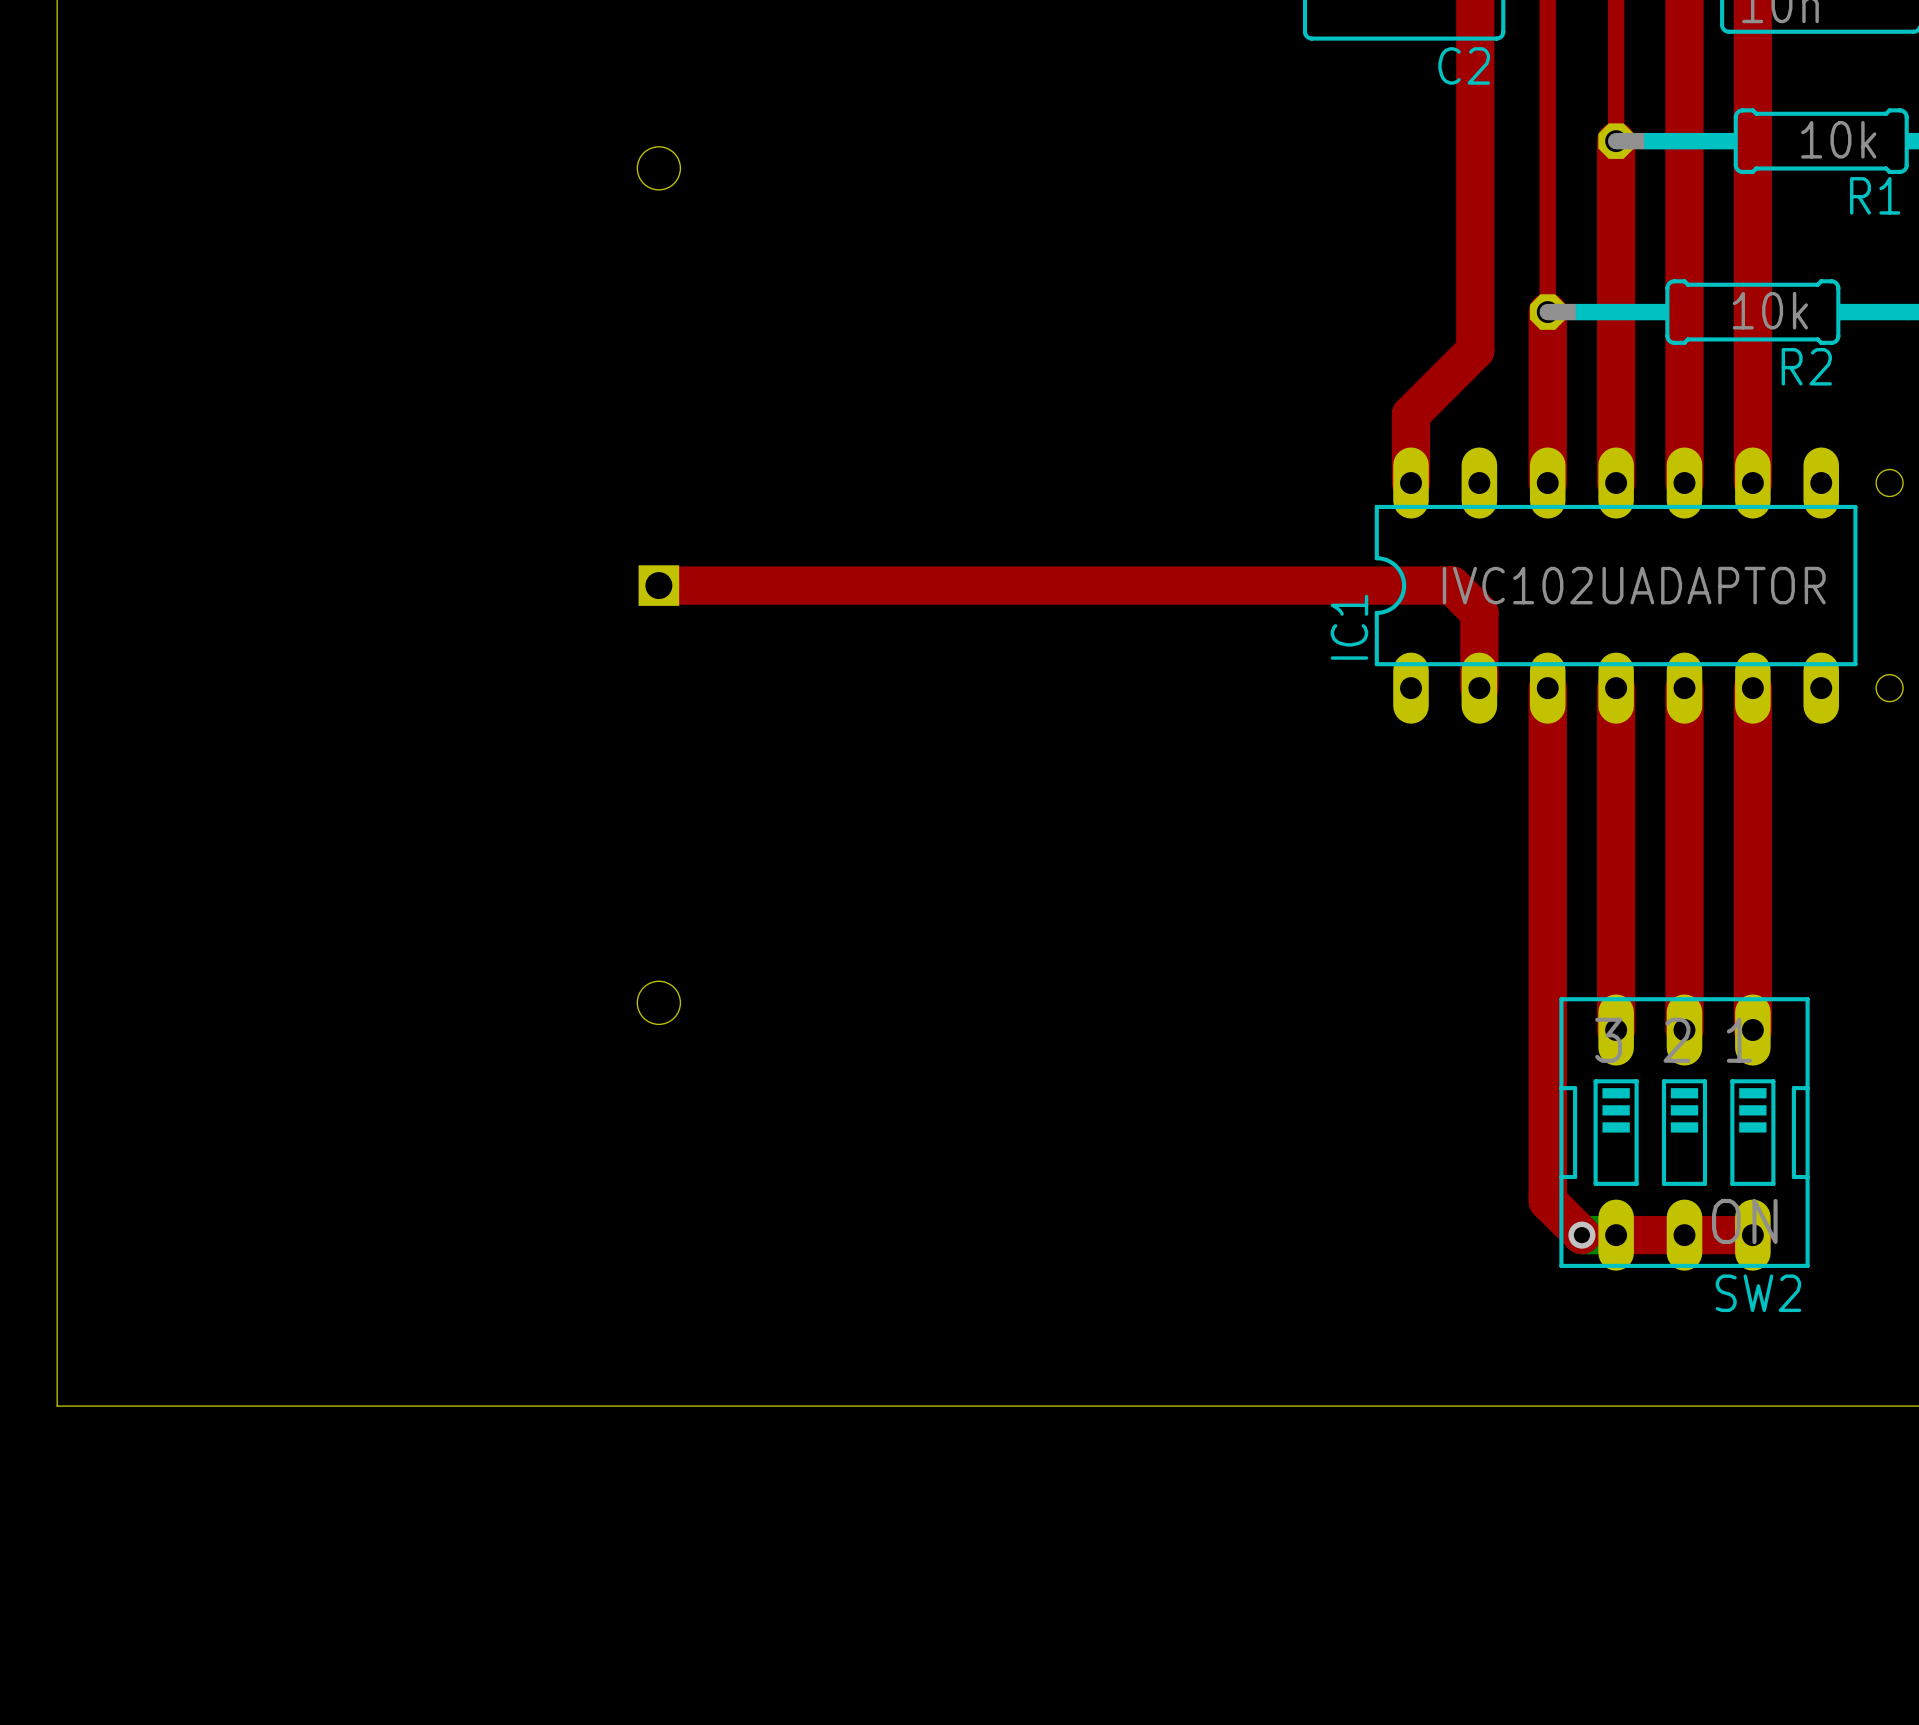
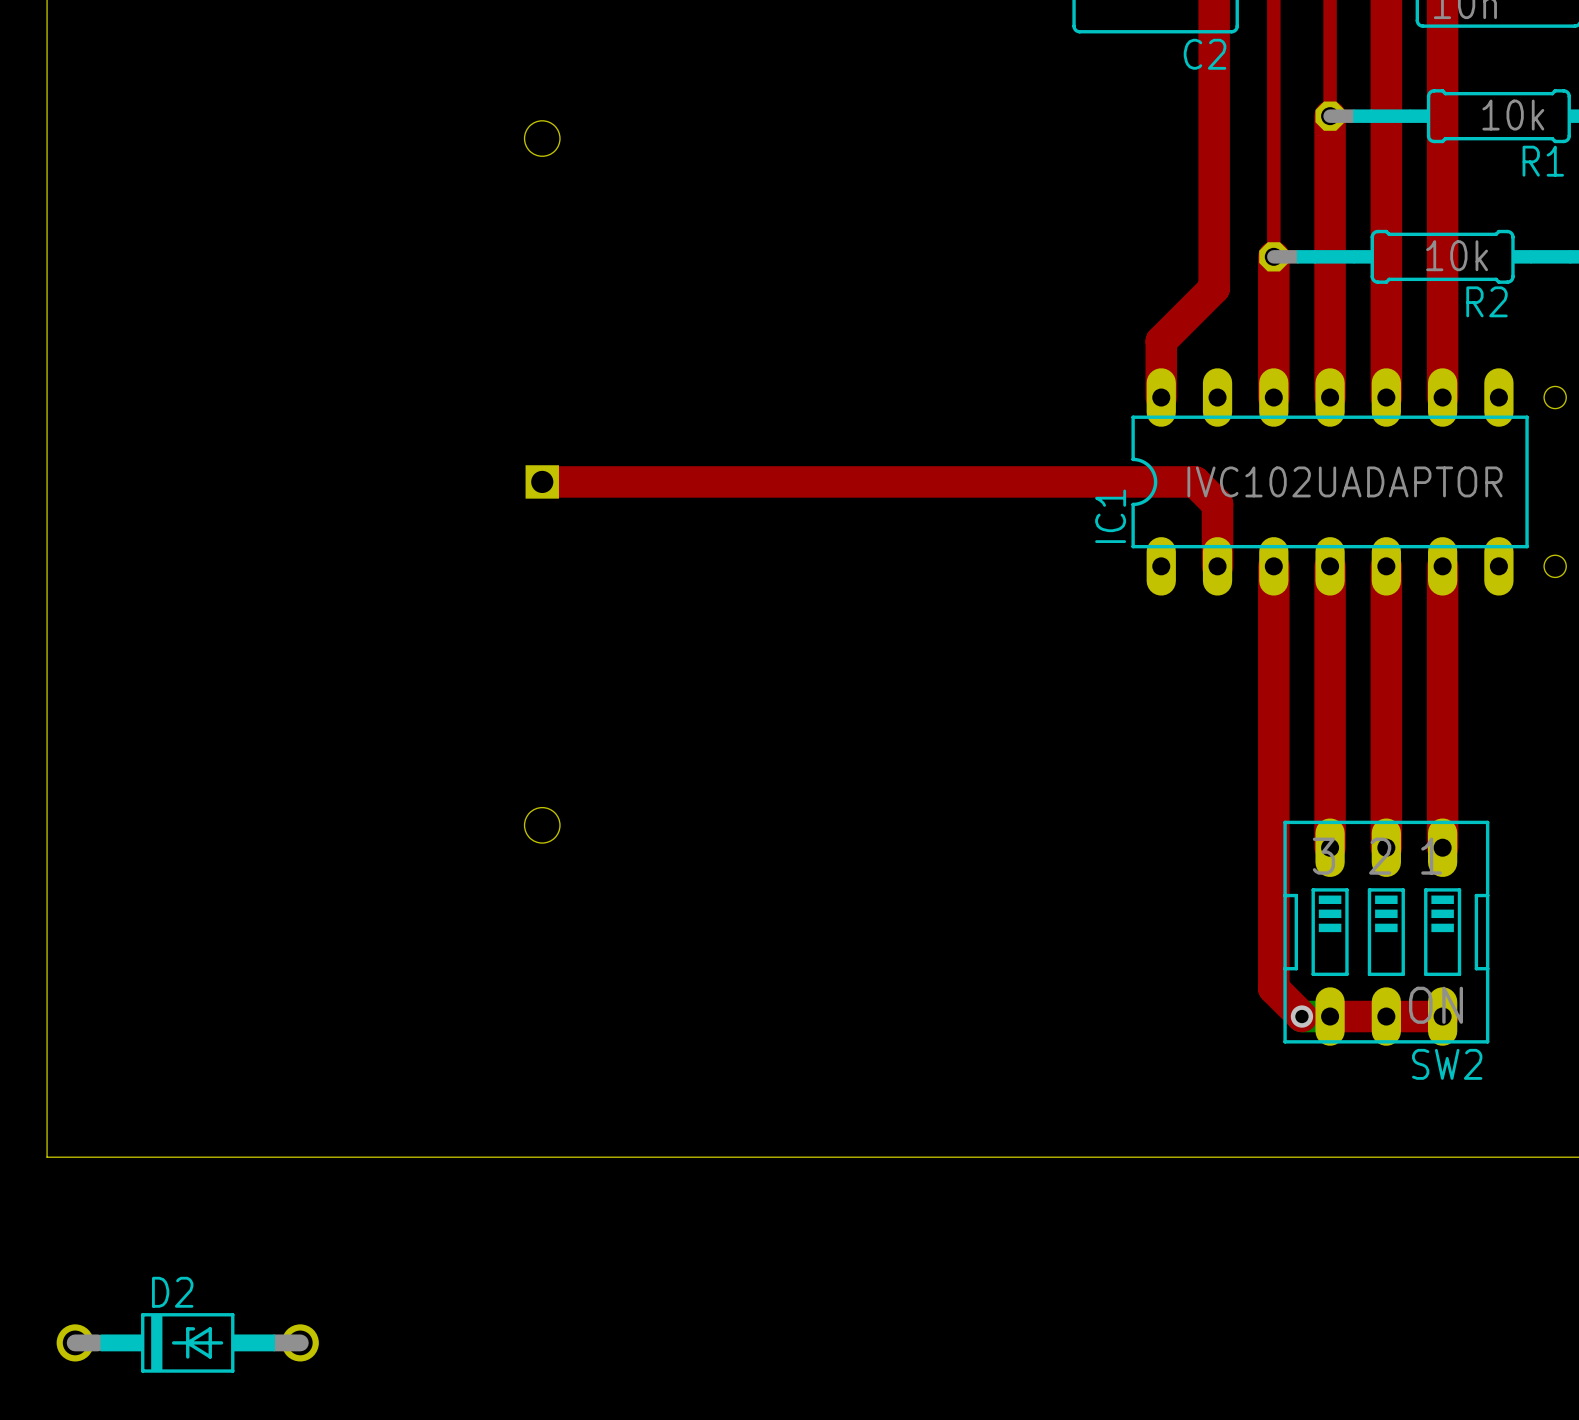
D2: none -> (187, 1342)

